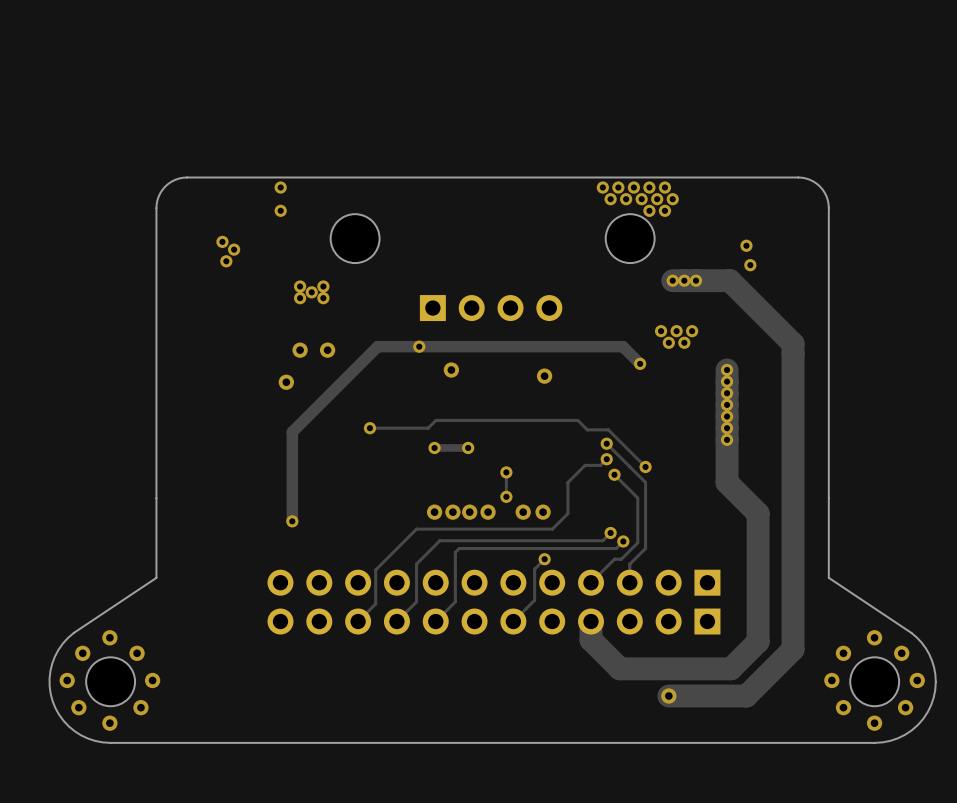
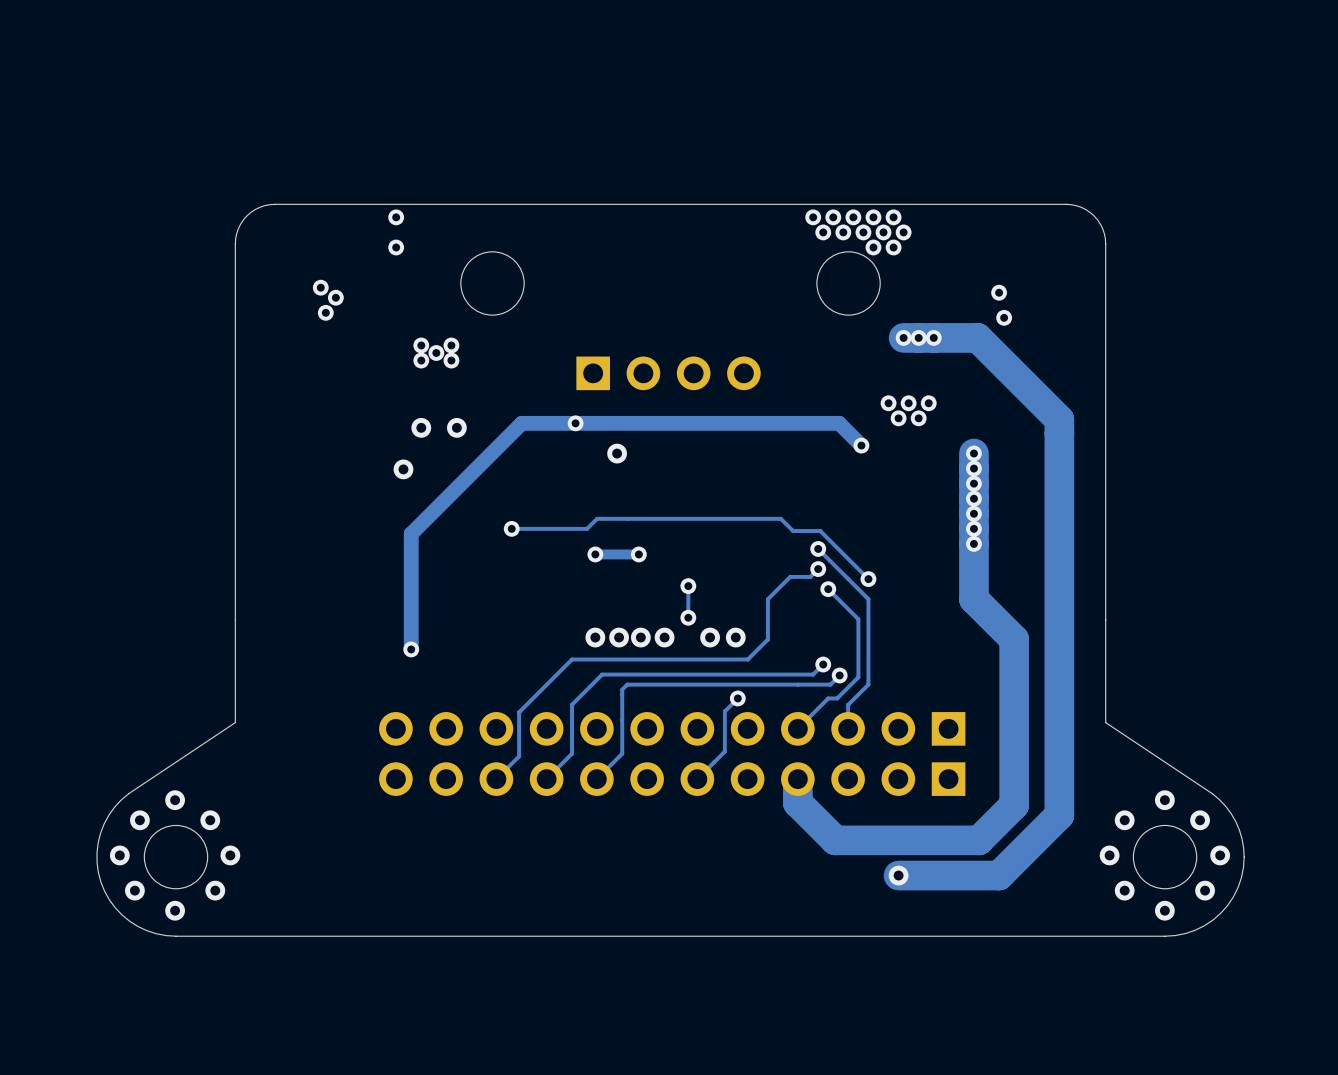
via: (544, 376) -> none

